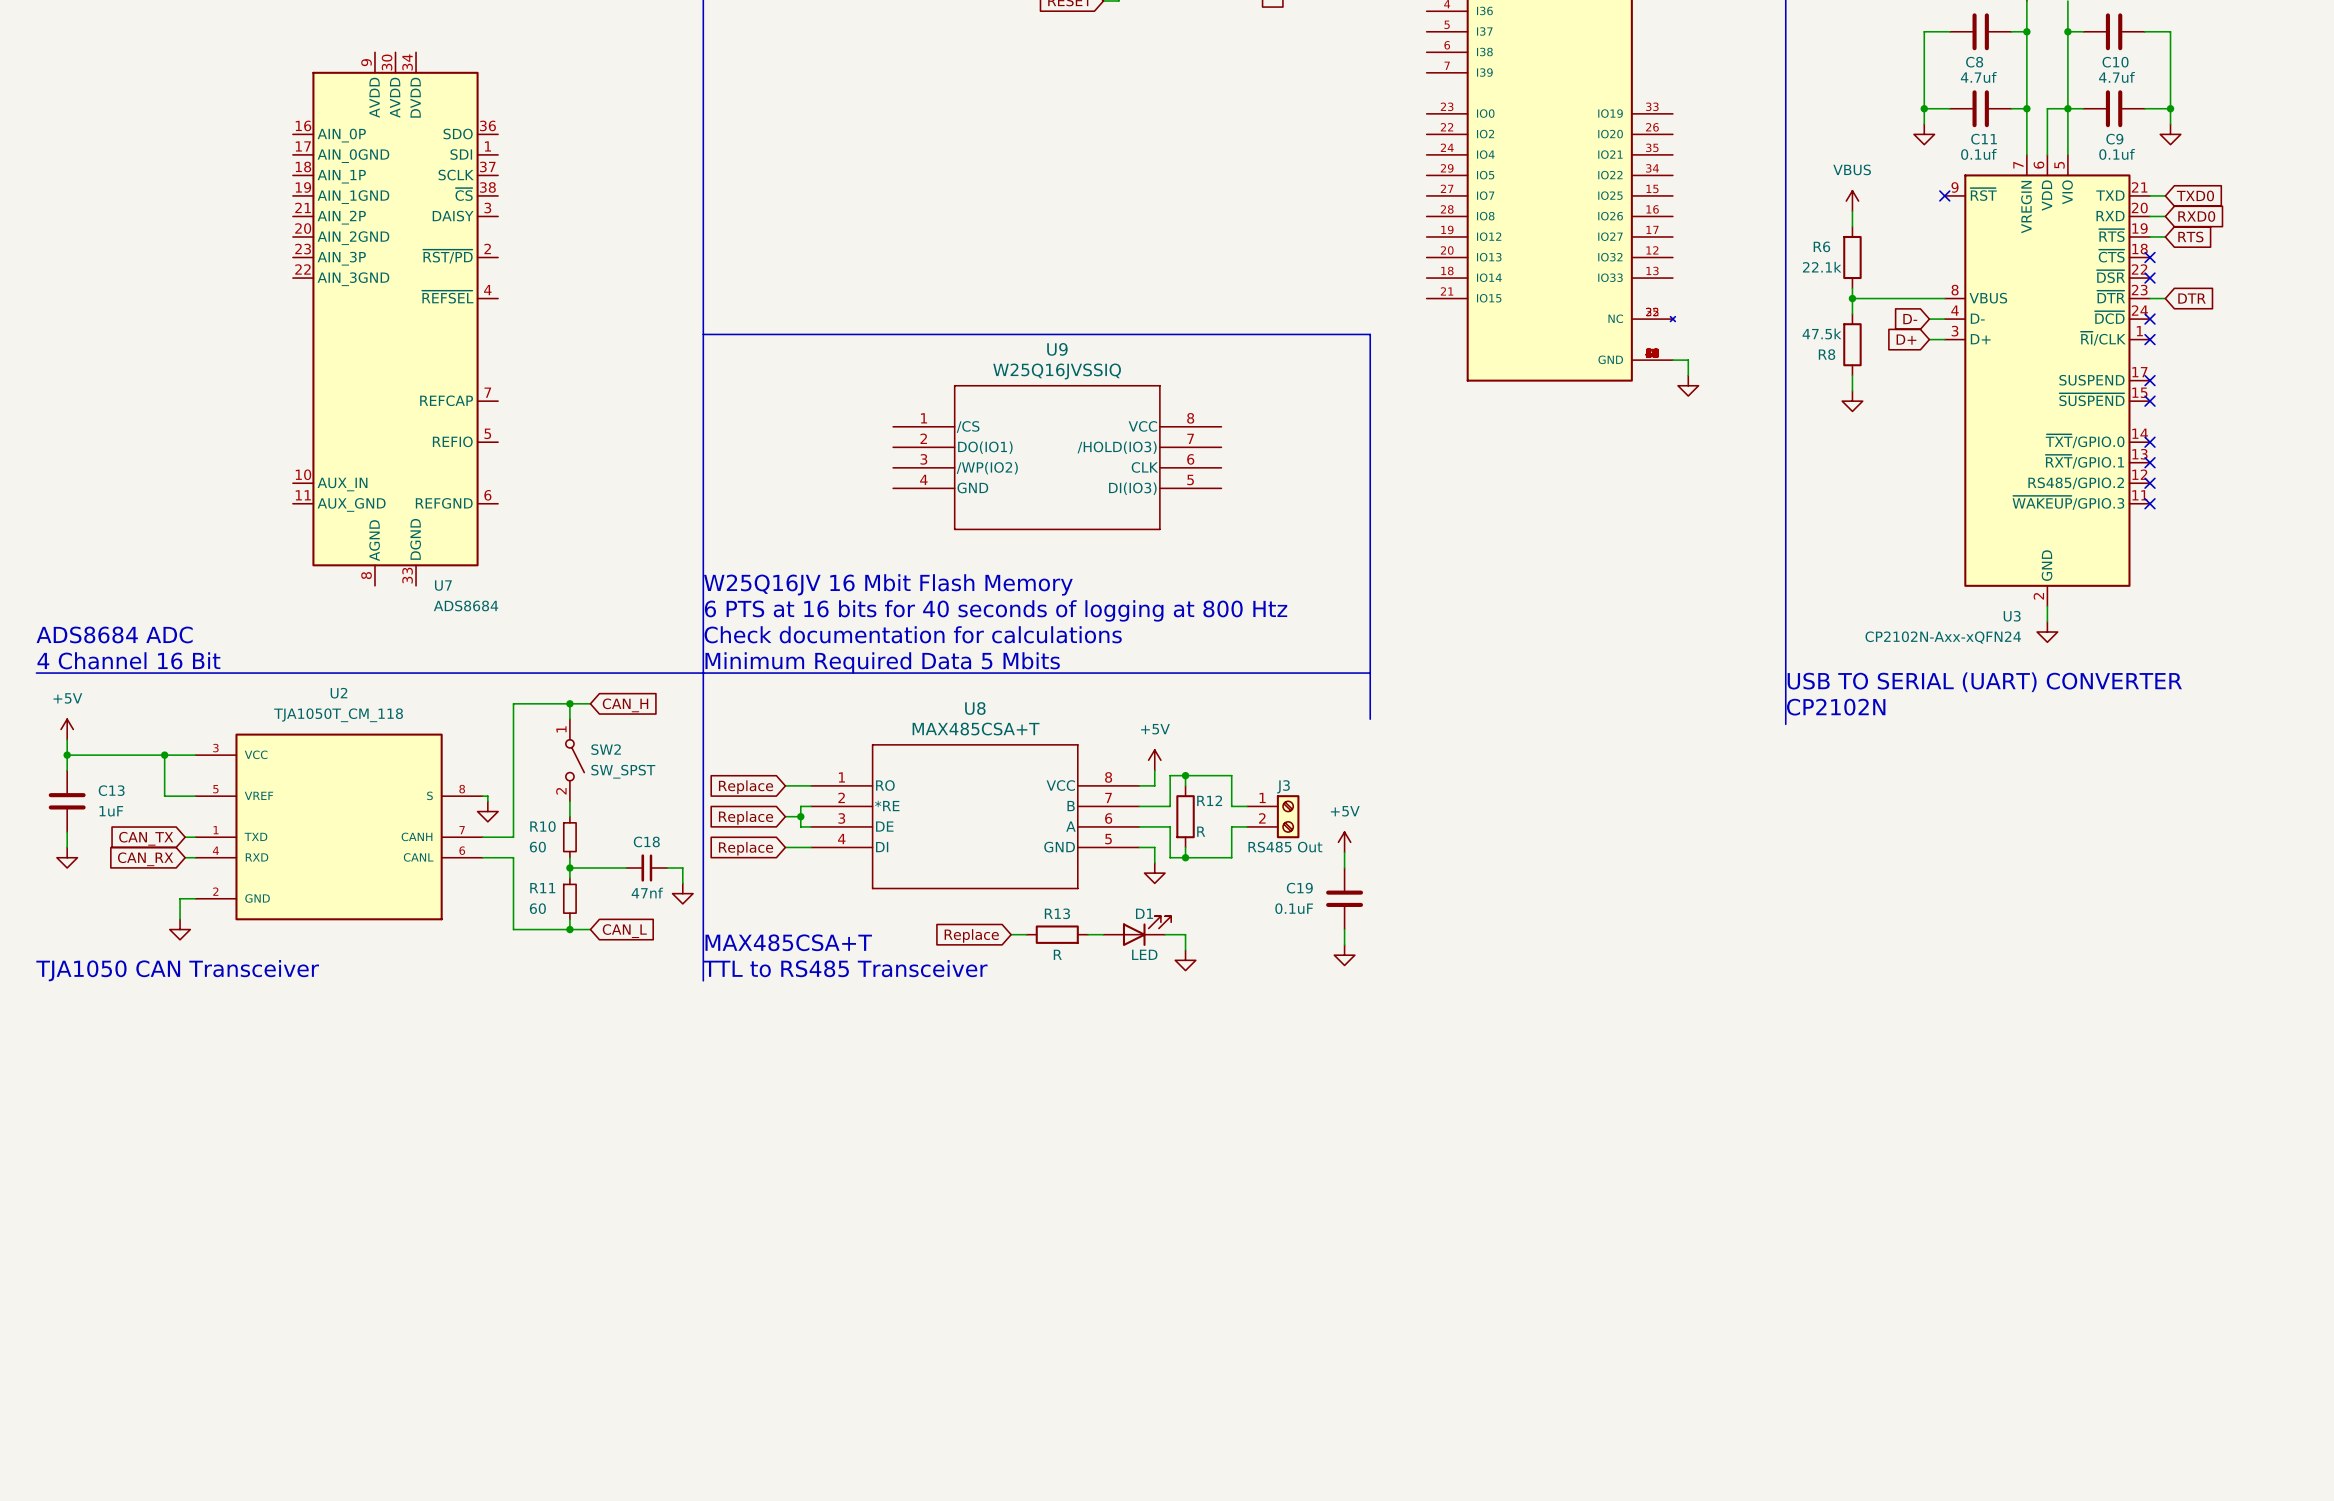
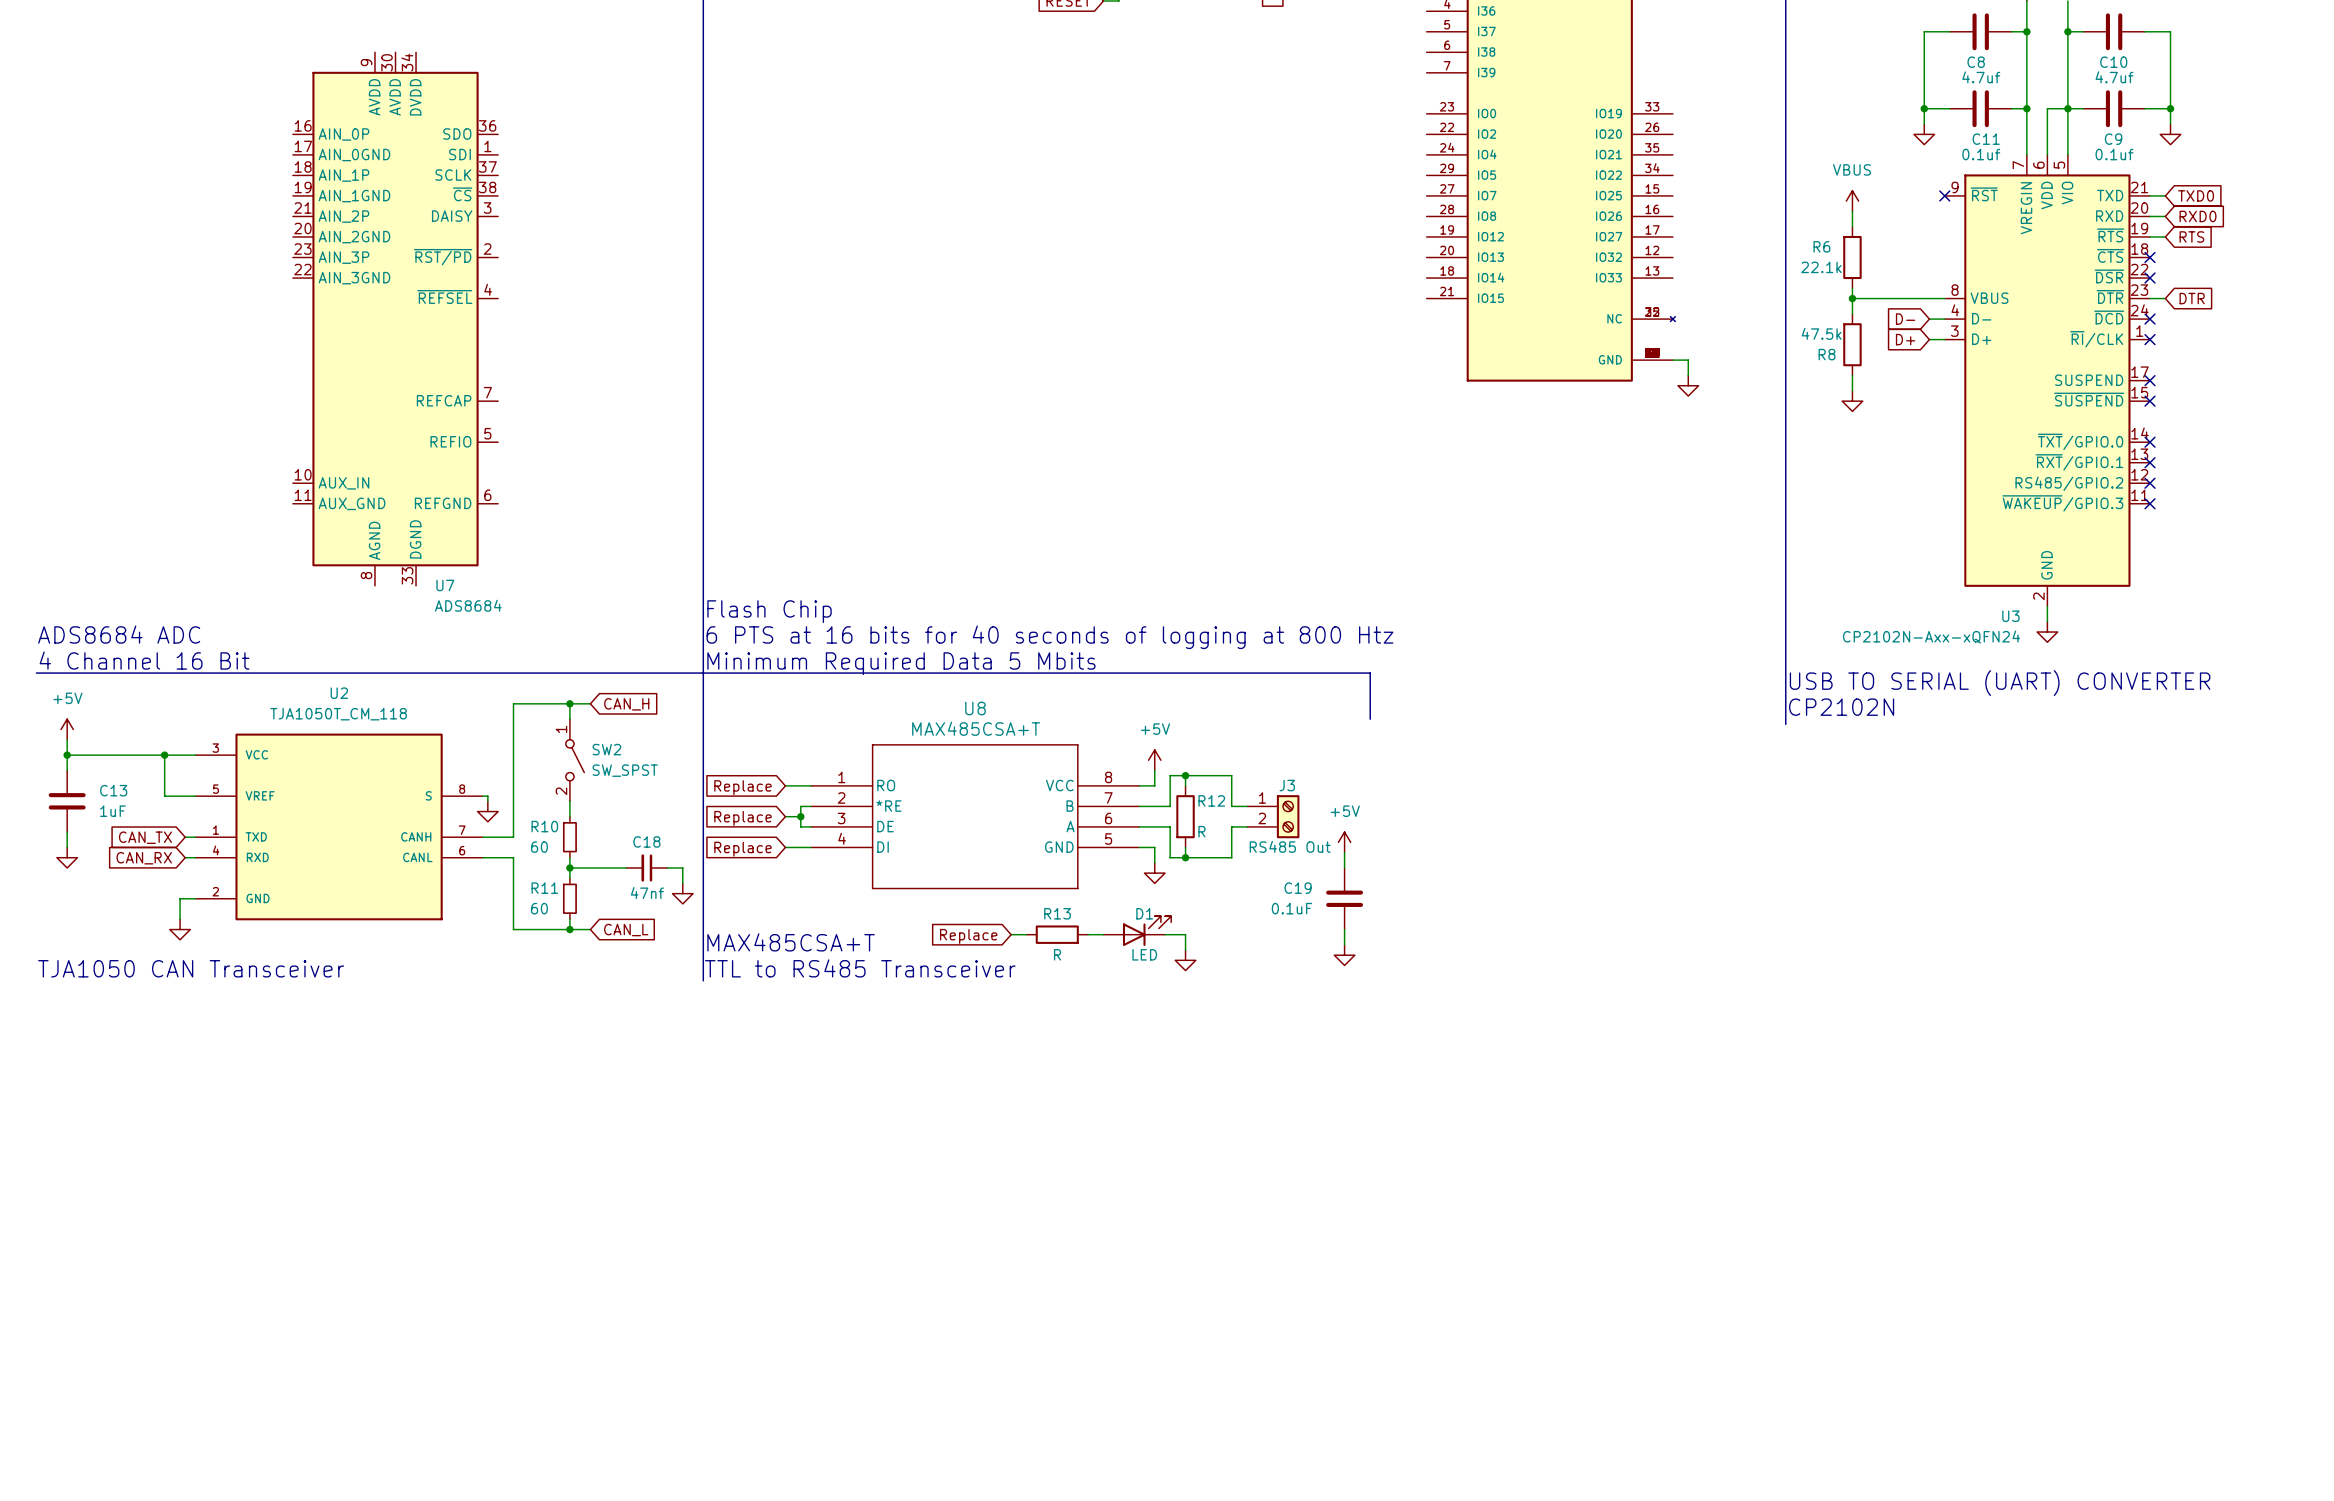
line: (703, 334) (1370, 334) (1370, 673) -> none
U9: W25Q16JVSSIQ (1057, 457) -> none
text: W25Q16JV 16 Mbit Flash Memory (888, 584) -> none
text: 6 PTS at 16 bits for 40 seconds of logging at 800 Htz (996, 610) -> Flash Chip (769, 611)
text: Check documentation for calculations (913, 634) -> 6 PTS at 16 bits for 40 seconds of logging at 800 Htz (1049, 637)

